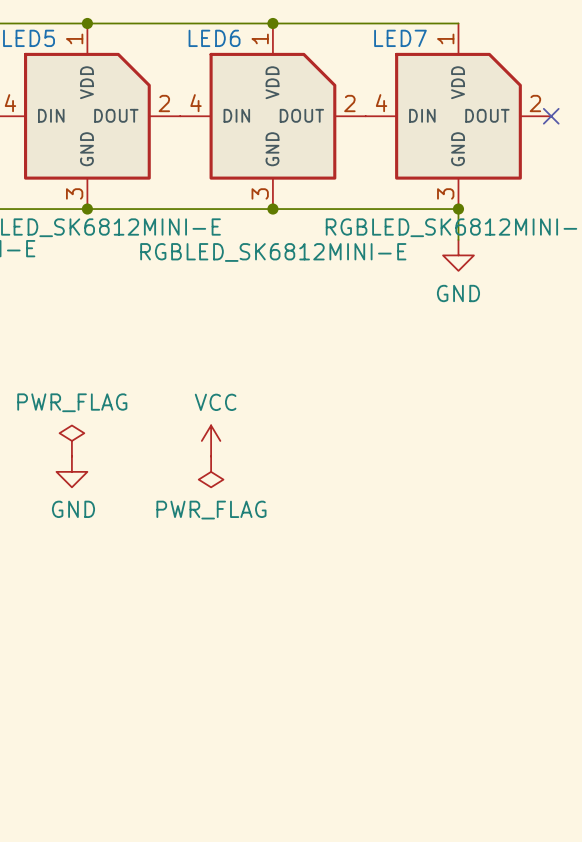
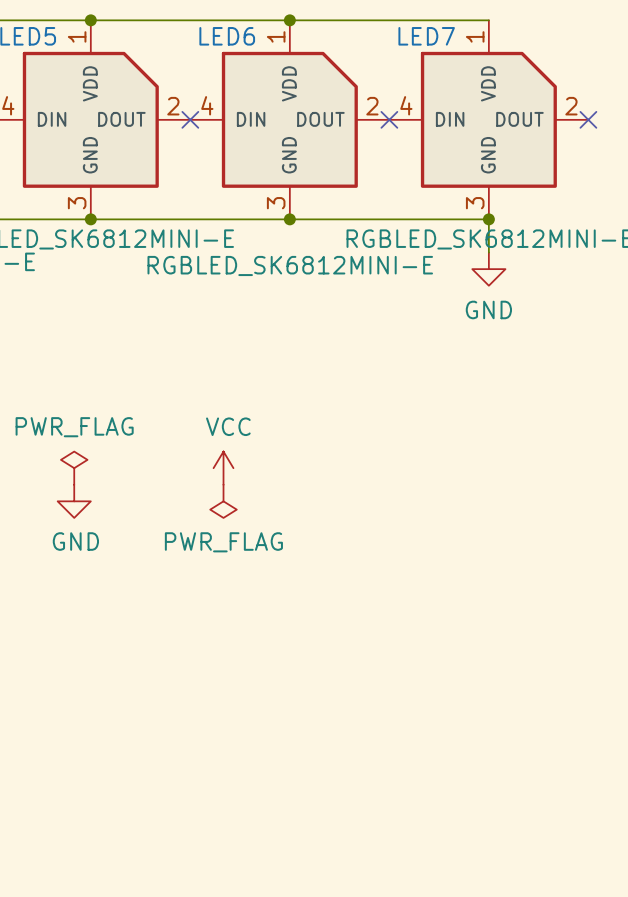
no-connect mark: none -> (190, 119)
no-connect mark: none -> (389, 119)

